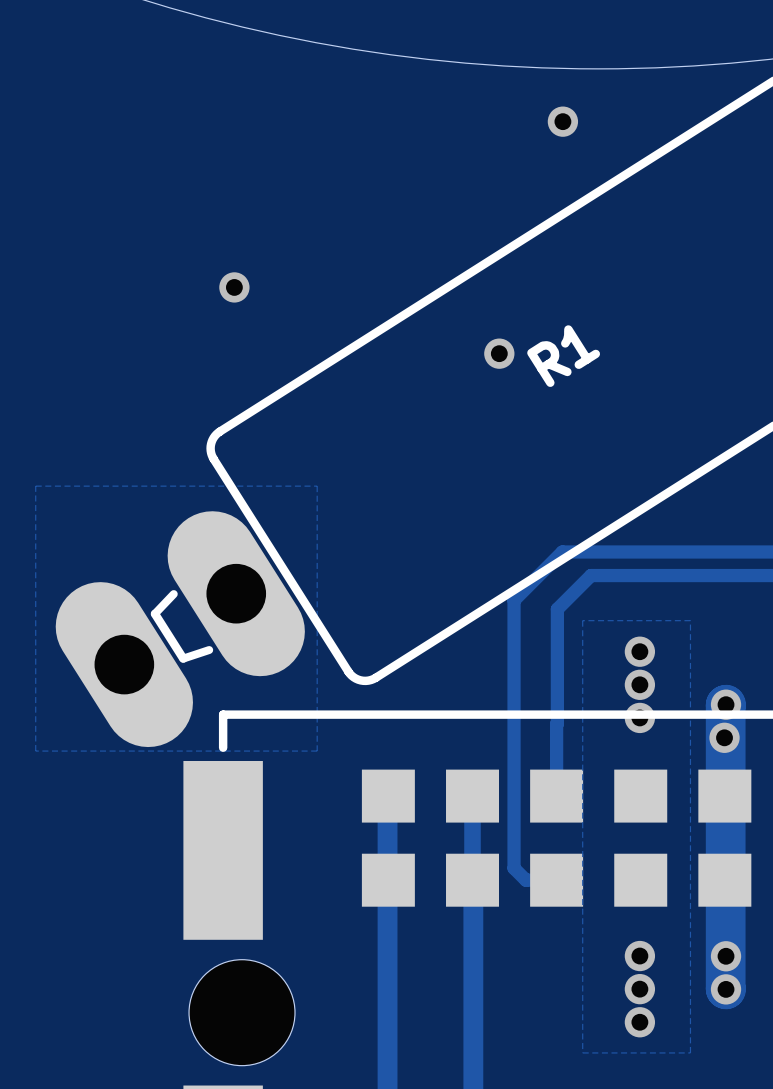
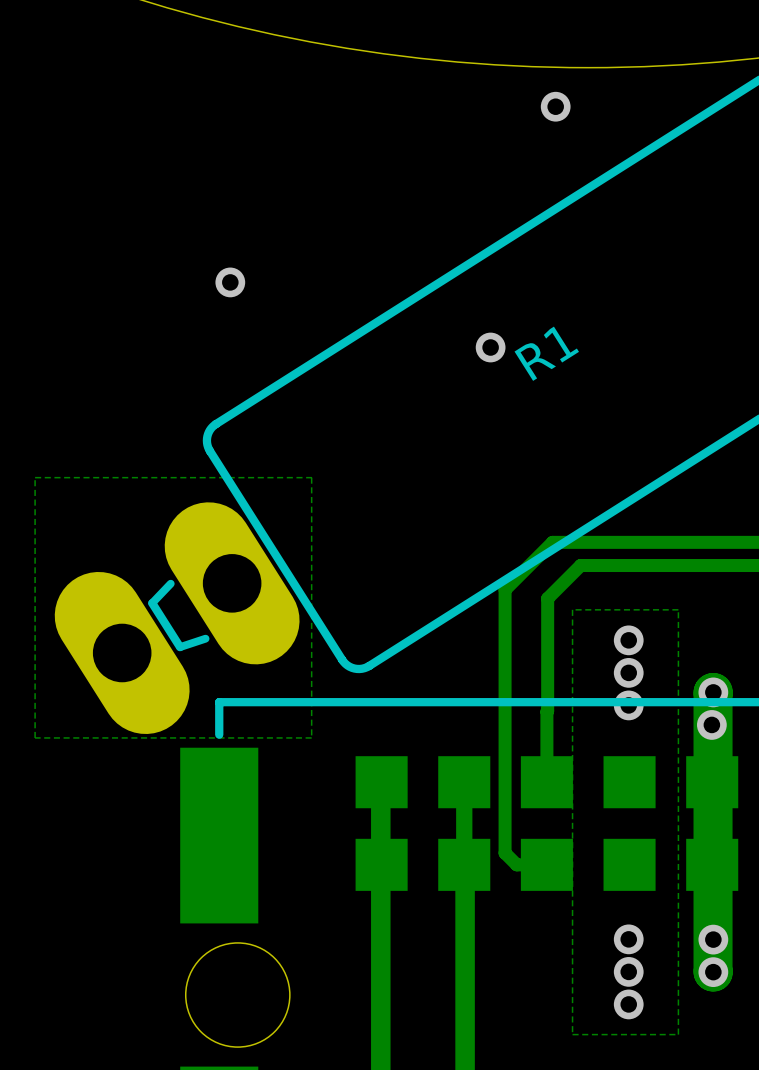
via position: (562, 121) -> (555, 106)

